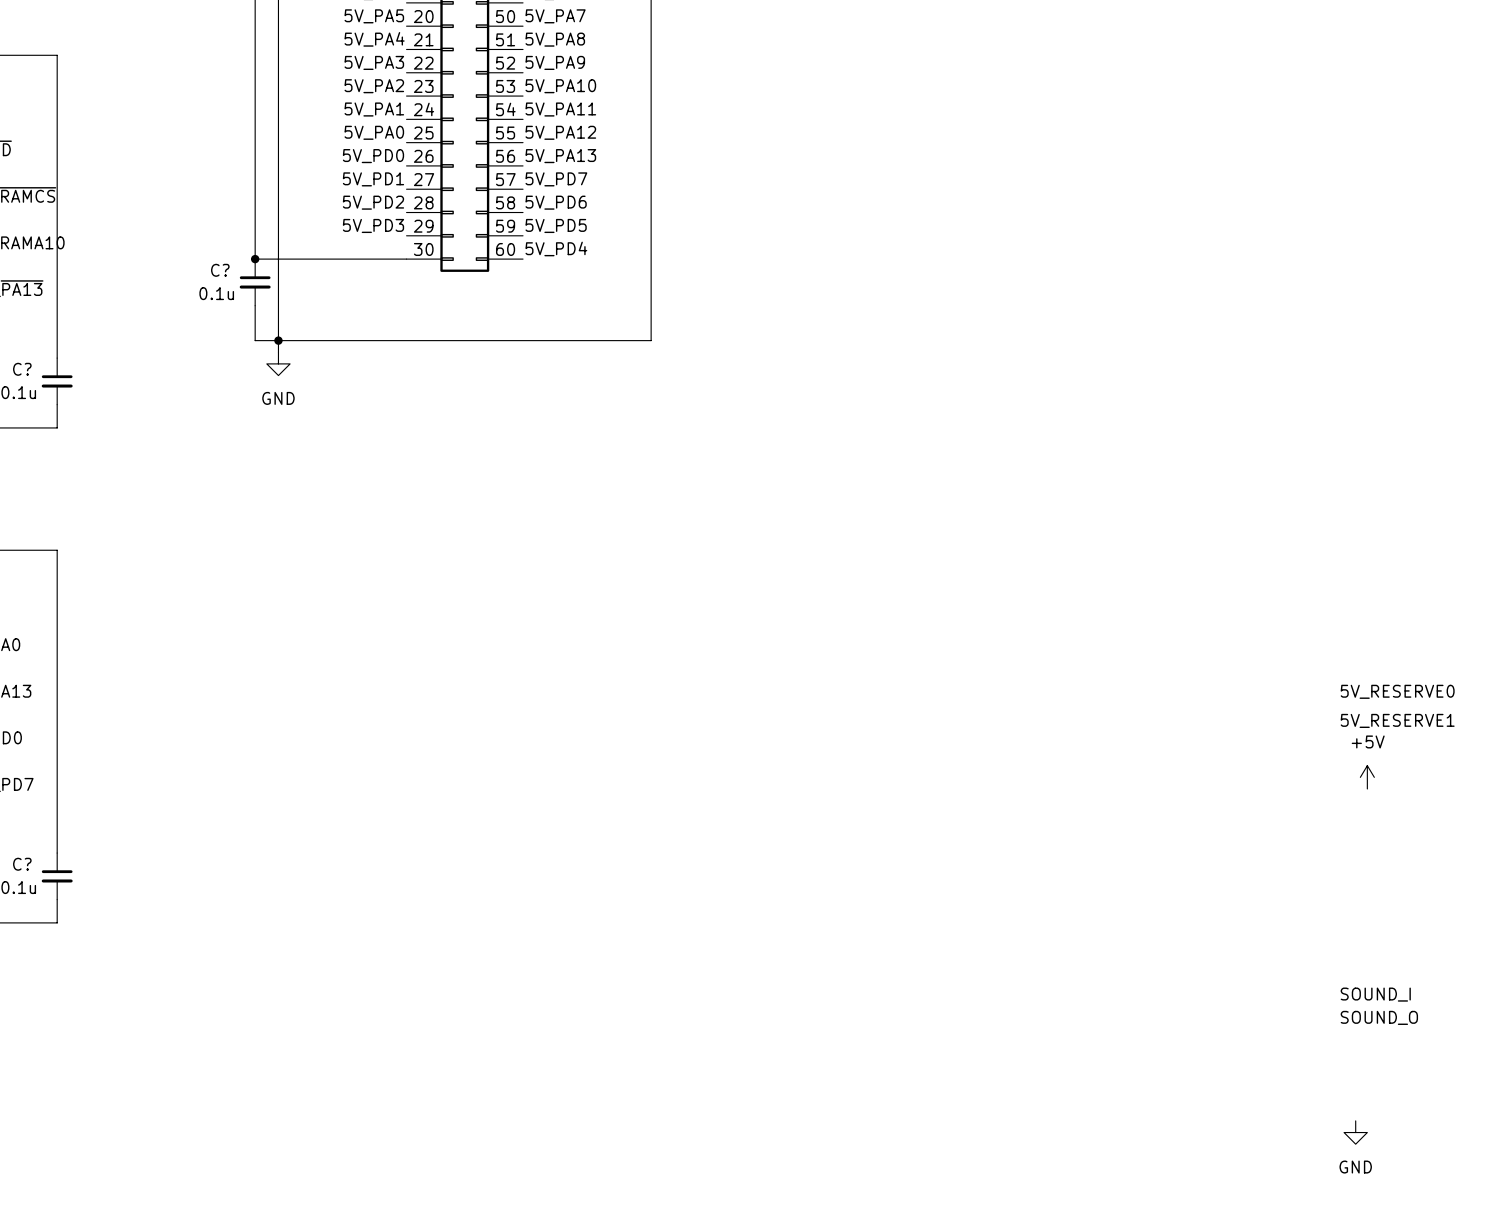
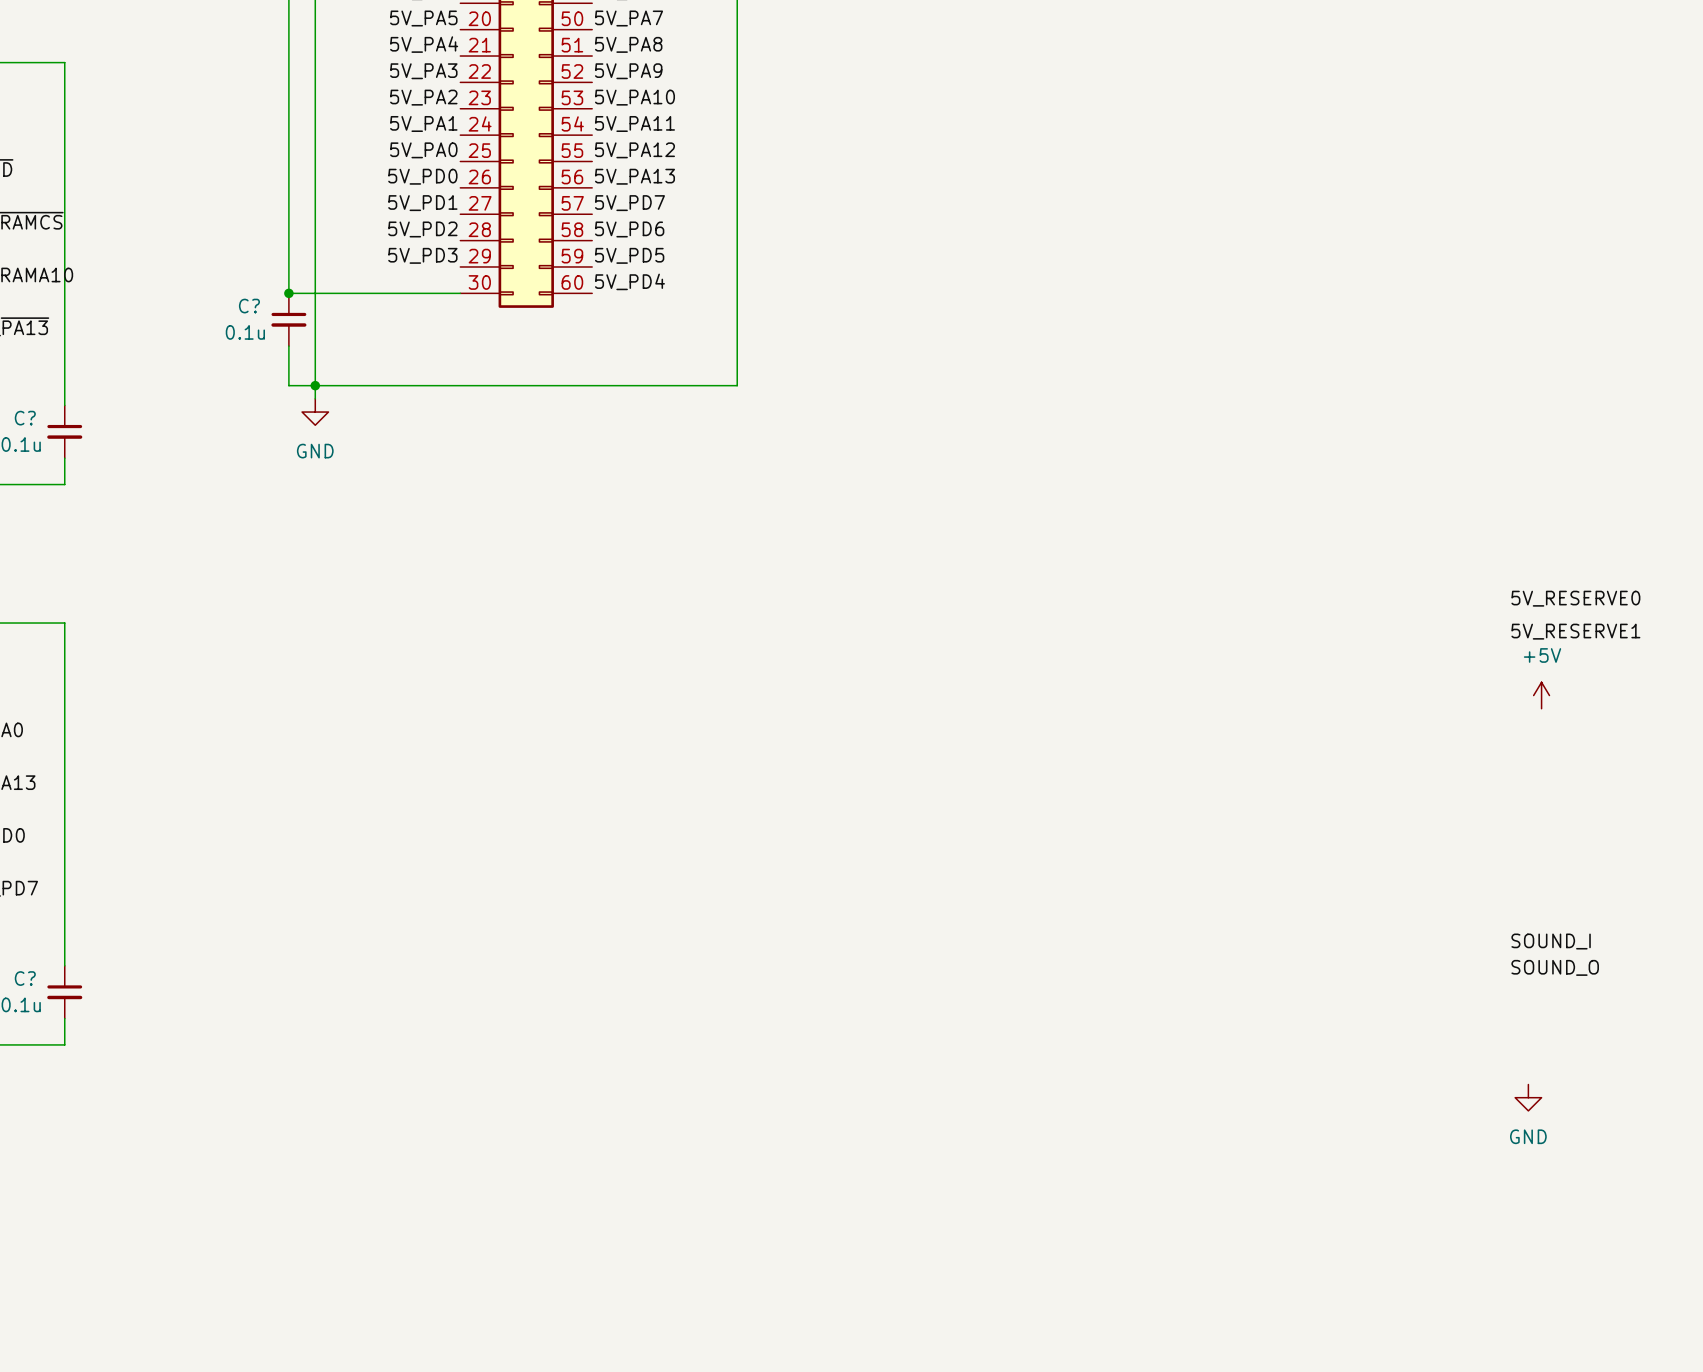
label position: 5V_RESERVE0 (1397, 691) -> 5V_RESERVE0 (1575, 598)
label position: 5V_RESERVE1 (1397, 720) -> 5V_RESERVE1 (1575, 631)
power symbol position: +5V (1367, 777) -> +5V (1541, 695)
label position: SOUND_I (1375, 994) -> SOUND_I (1551, 941)
label position: SOUND_O (1379, 1017) -> SOUND_O (1555, 967)
power symbol position: GND (1355, 1132) -> GND (1528, 1097)

